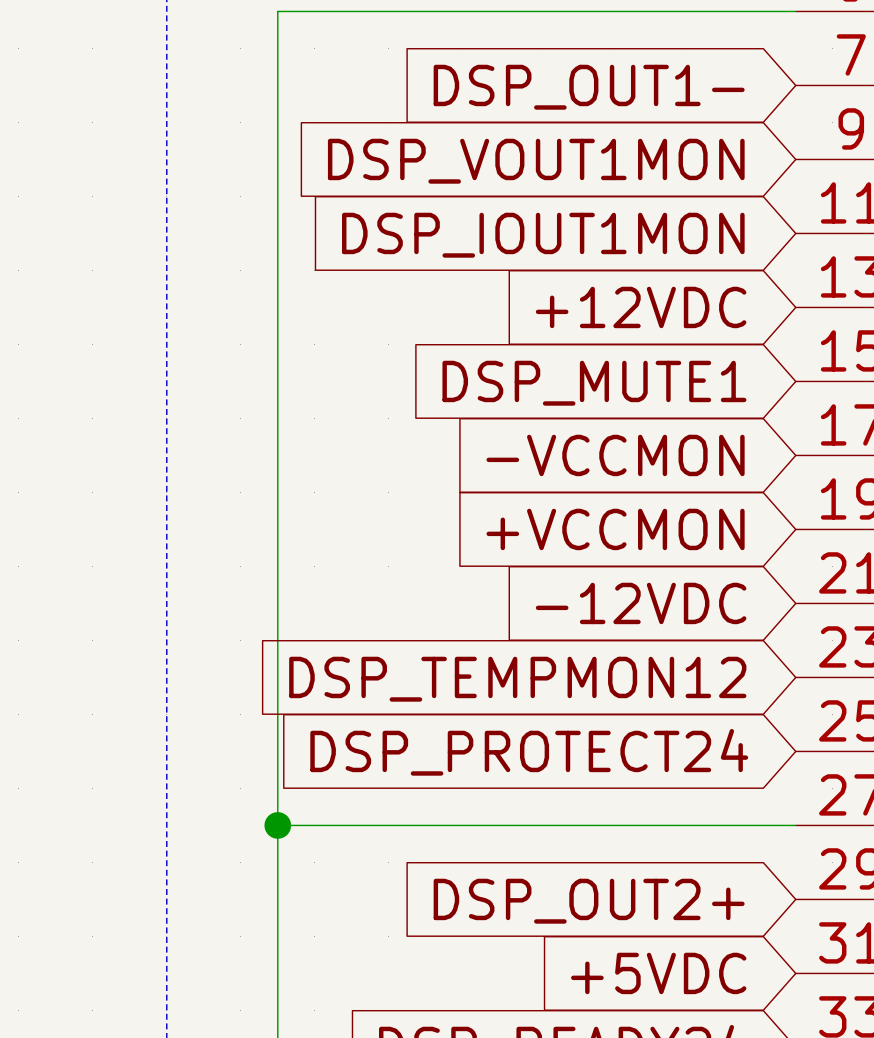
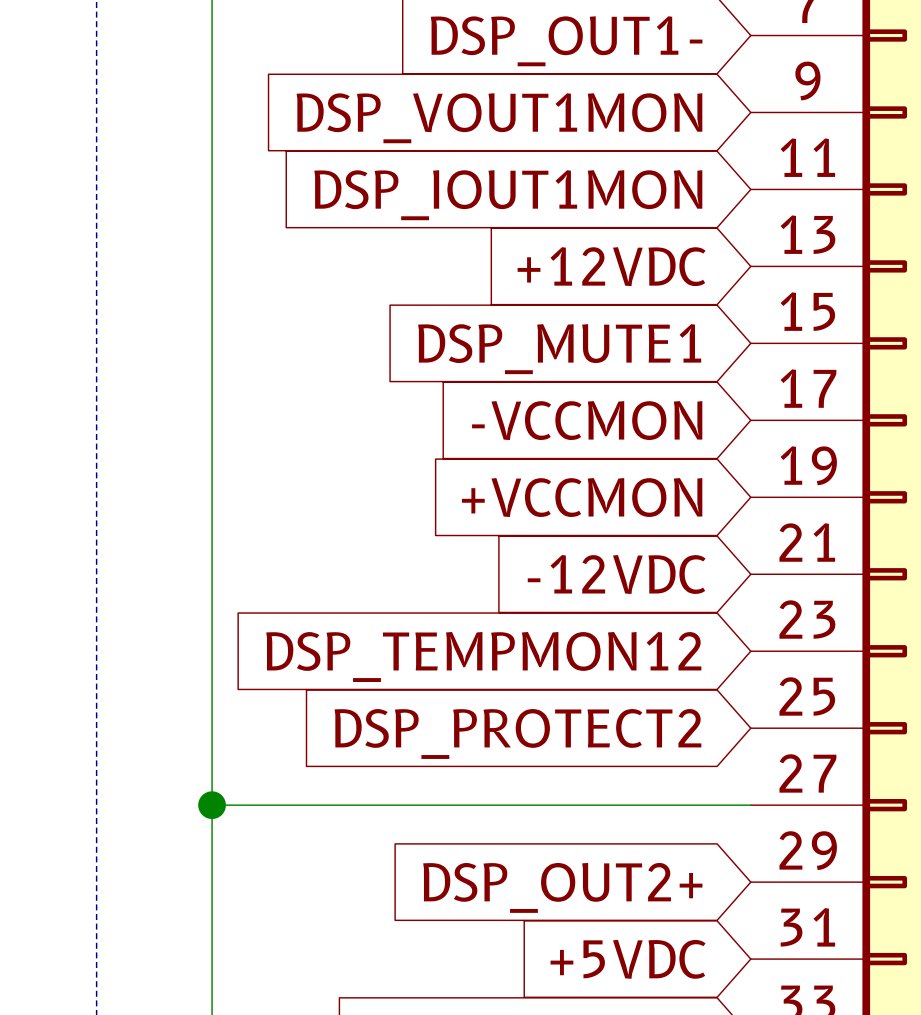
global label: DSP_PROTECT24 (529, 752) -> DSP_PROTECT2 (517, 733)

